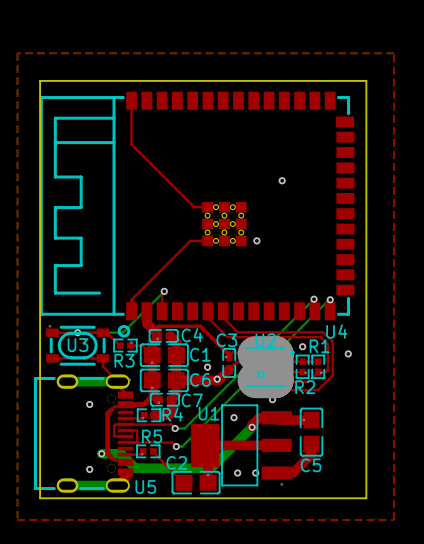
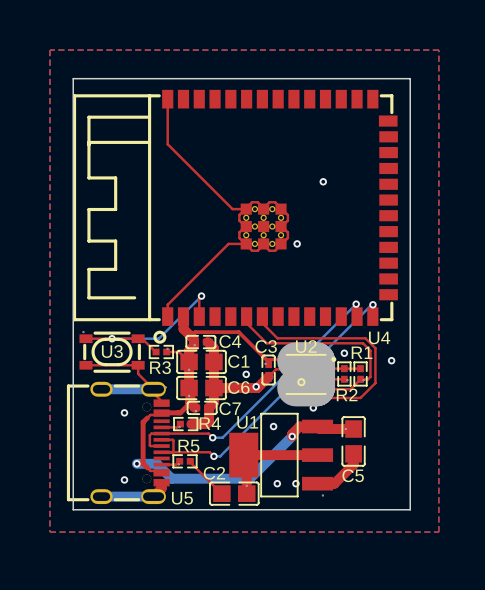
top track: none -> (263, 208) (257, 202) (252, 202) (246, 209)
top track: none -> (263, 208) (269, 202) (275, 202) (287, 214) (287, 220) (282, 226)
top track: none -> (245, 209) (239, 214) (239, 220) (245, 226)
top track: none -> (245, 226) (239, 232) (239, 238) (245, 243)
top track: none -> (282, 226) (287, 232) (287, 238) (275, 250) (269, 250) (263, 244)
top track: none -> (246, 243) (252, 250) (257, 250) (263, 244)

